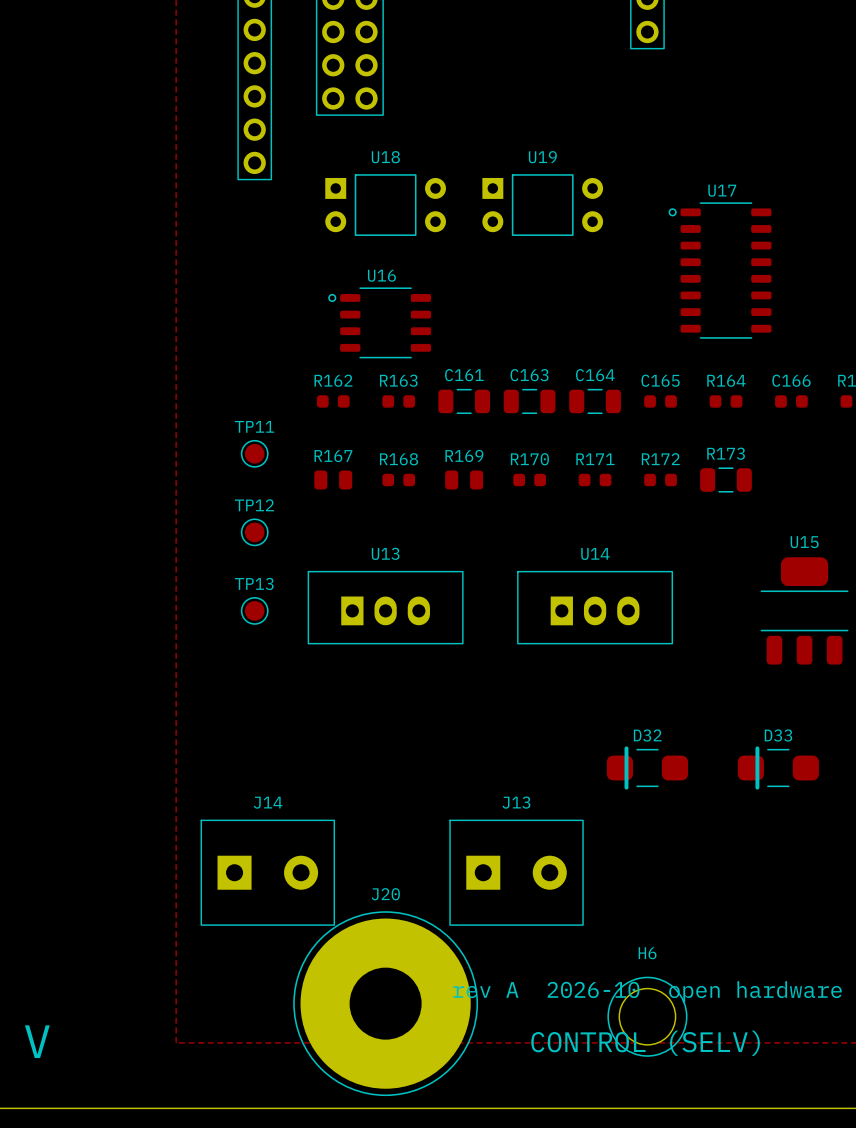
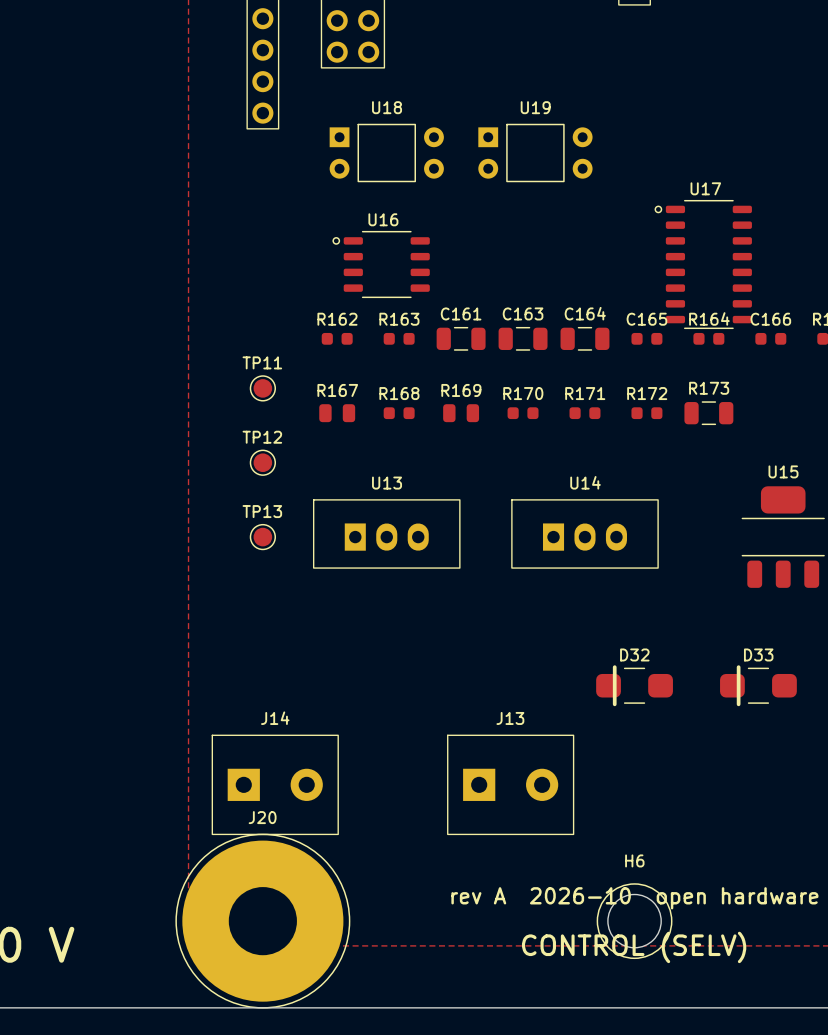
U17 position: (720, 270) -> (703, 264)
J20 position: (385, 1003) -> (262, 921)

